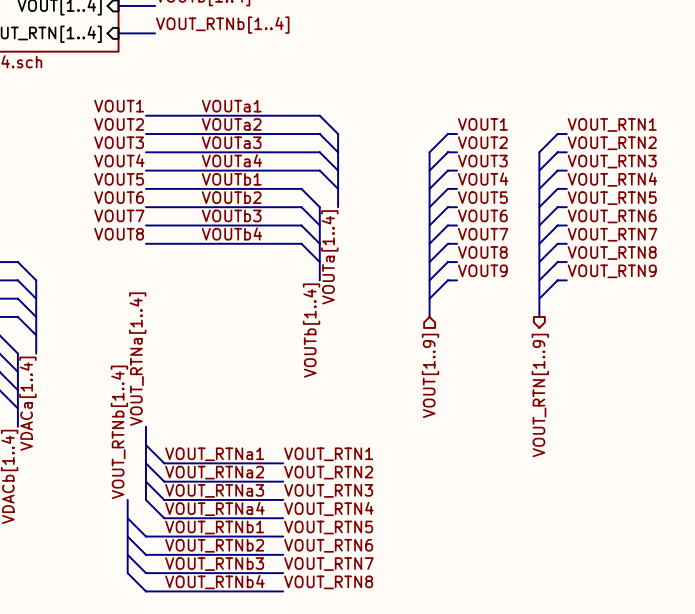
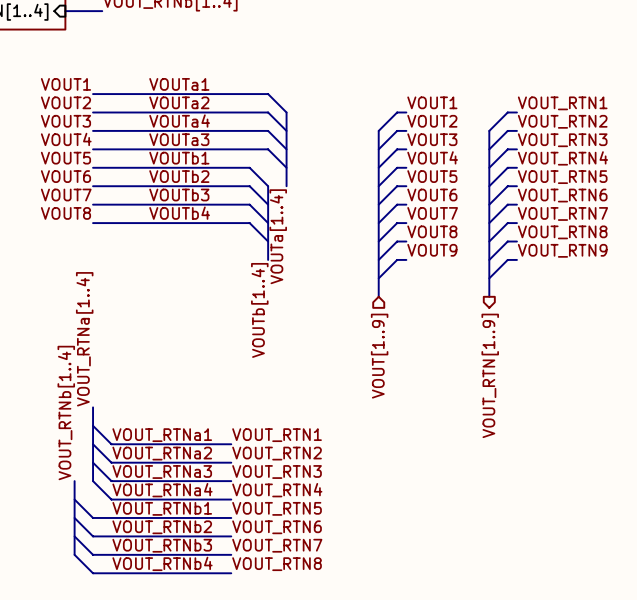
label: VOUTa3 (231, 142) -> VOUTa4 (179, 121)
label: VOUTa4 (231, 160) -> VOUTa3 (179, 139)

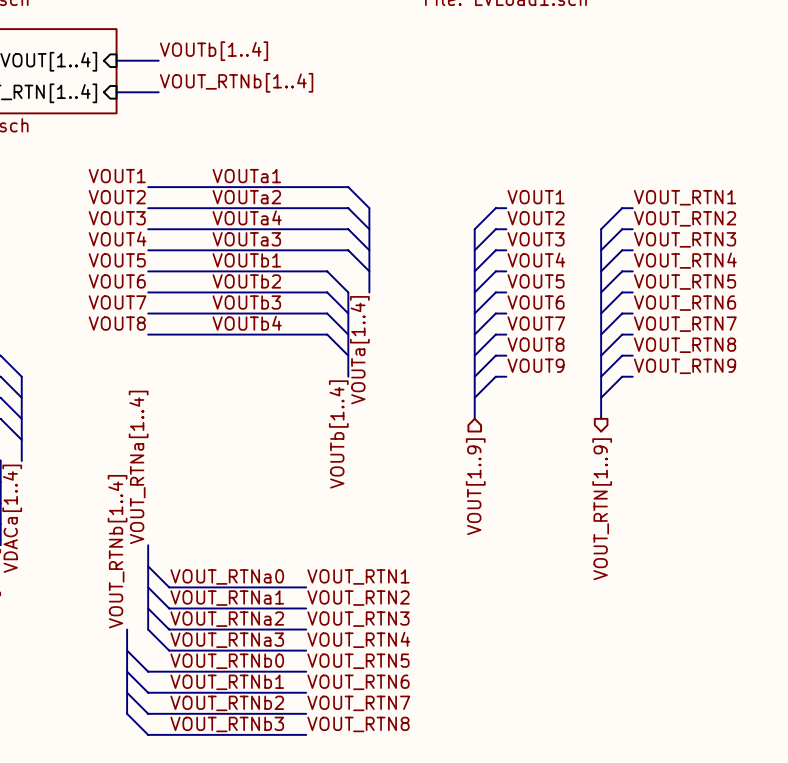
label: VOUT_RTNa1 (162, 435) -> VOUT_RTNa0 (227, 576)
label: VOUT_RTNa2 (162, 453) -> VOUT_RTNa1 (227, 598)
label: VOUT_RTNa3 (162, 472) -> VOUT_RTNa2 (227, 619)
label: VOUT_RTNa4 (162, 490) -> VOUT_RTNa3 (227, 640)
label: VOUT_RTNb1 (162, 508) -> VOUT_RTNb0 (227, 661)
label: VOUT_RTNb2 (162, 527) -> VOUT_RTNb1 (227, 682)
label: VOUT_RTNb3 (162, 545) -> VOUT_RTNb2 (227, 703)
label: VOUT_RTNb4 (162, 563) -> VOUT_RTNb3 (227, 724)

